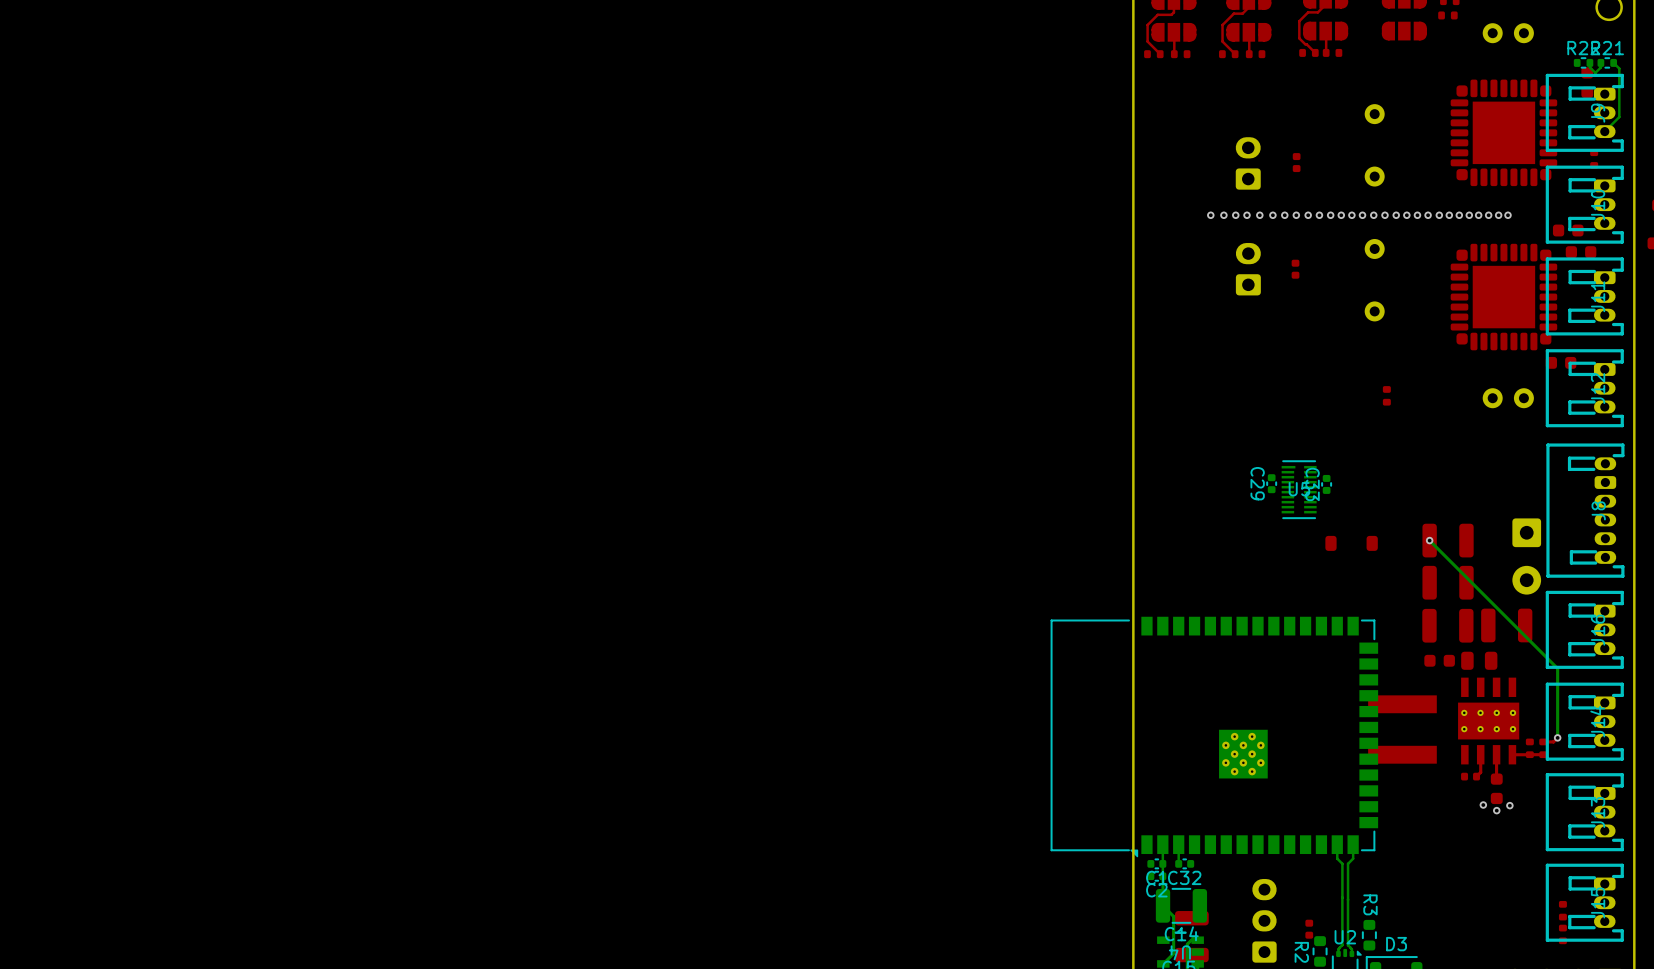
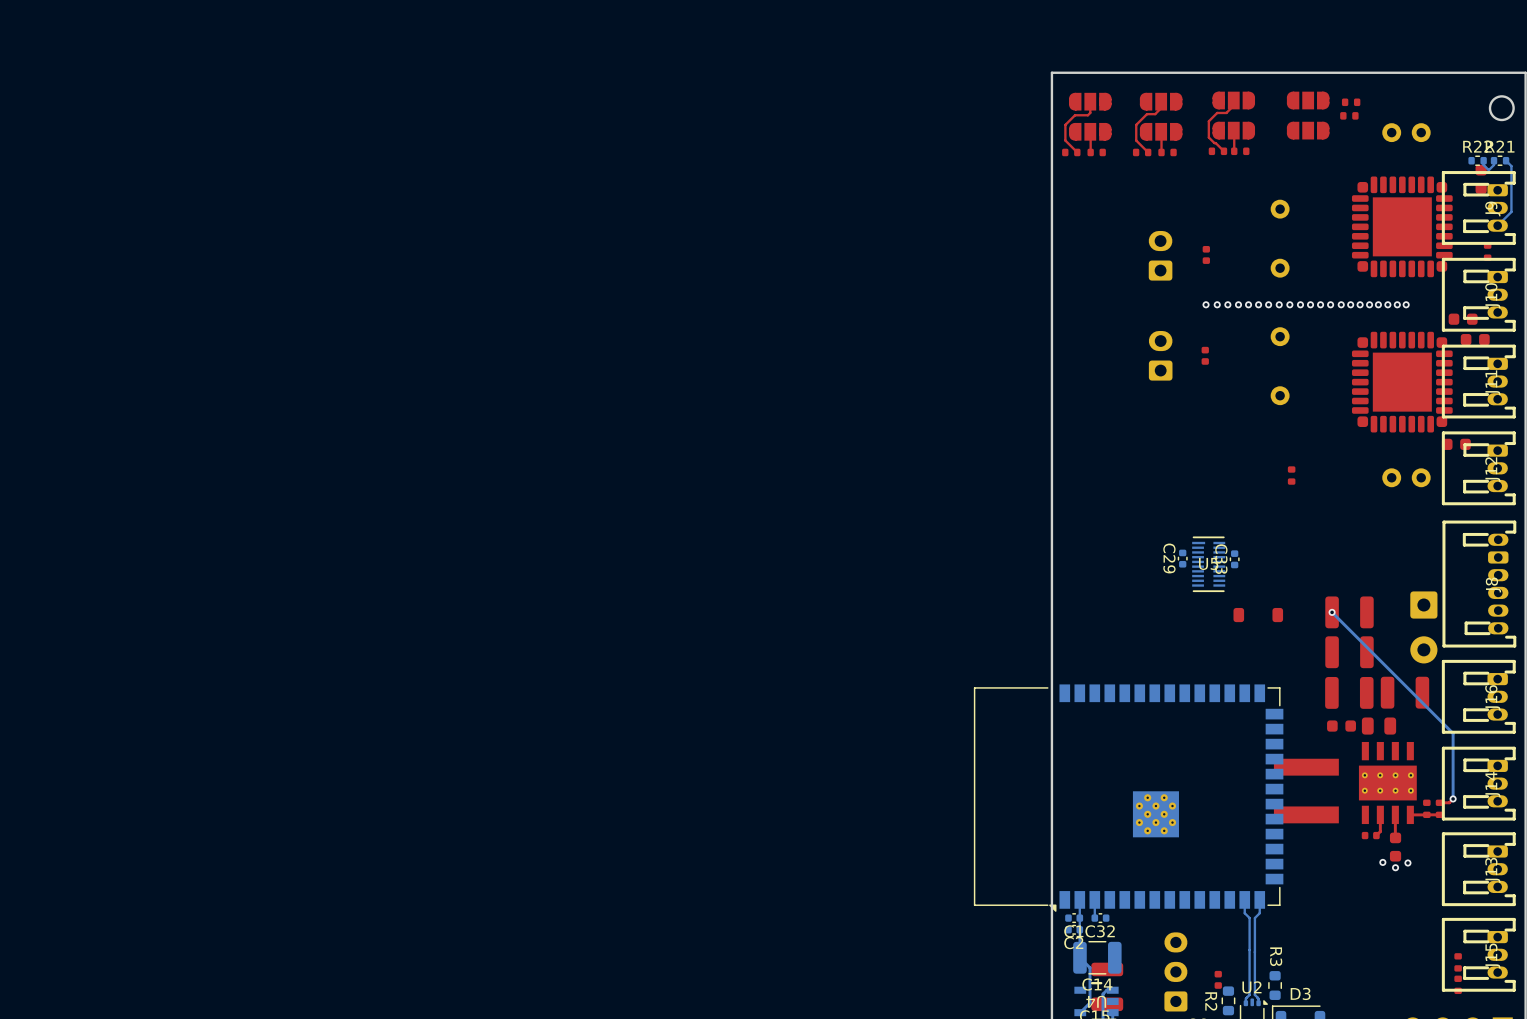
via: (1210, 215) -> none
via: (1223, 215) -> none
via: (1235, 215) -> none
via: (1247, 215) -> none
via: (1259, 215) -> none
via: (1272, 215) -> none
via: (1284, 215) -> none

